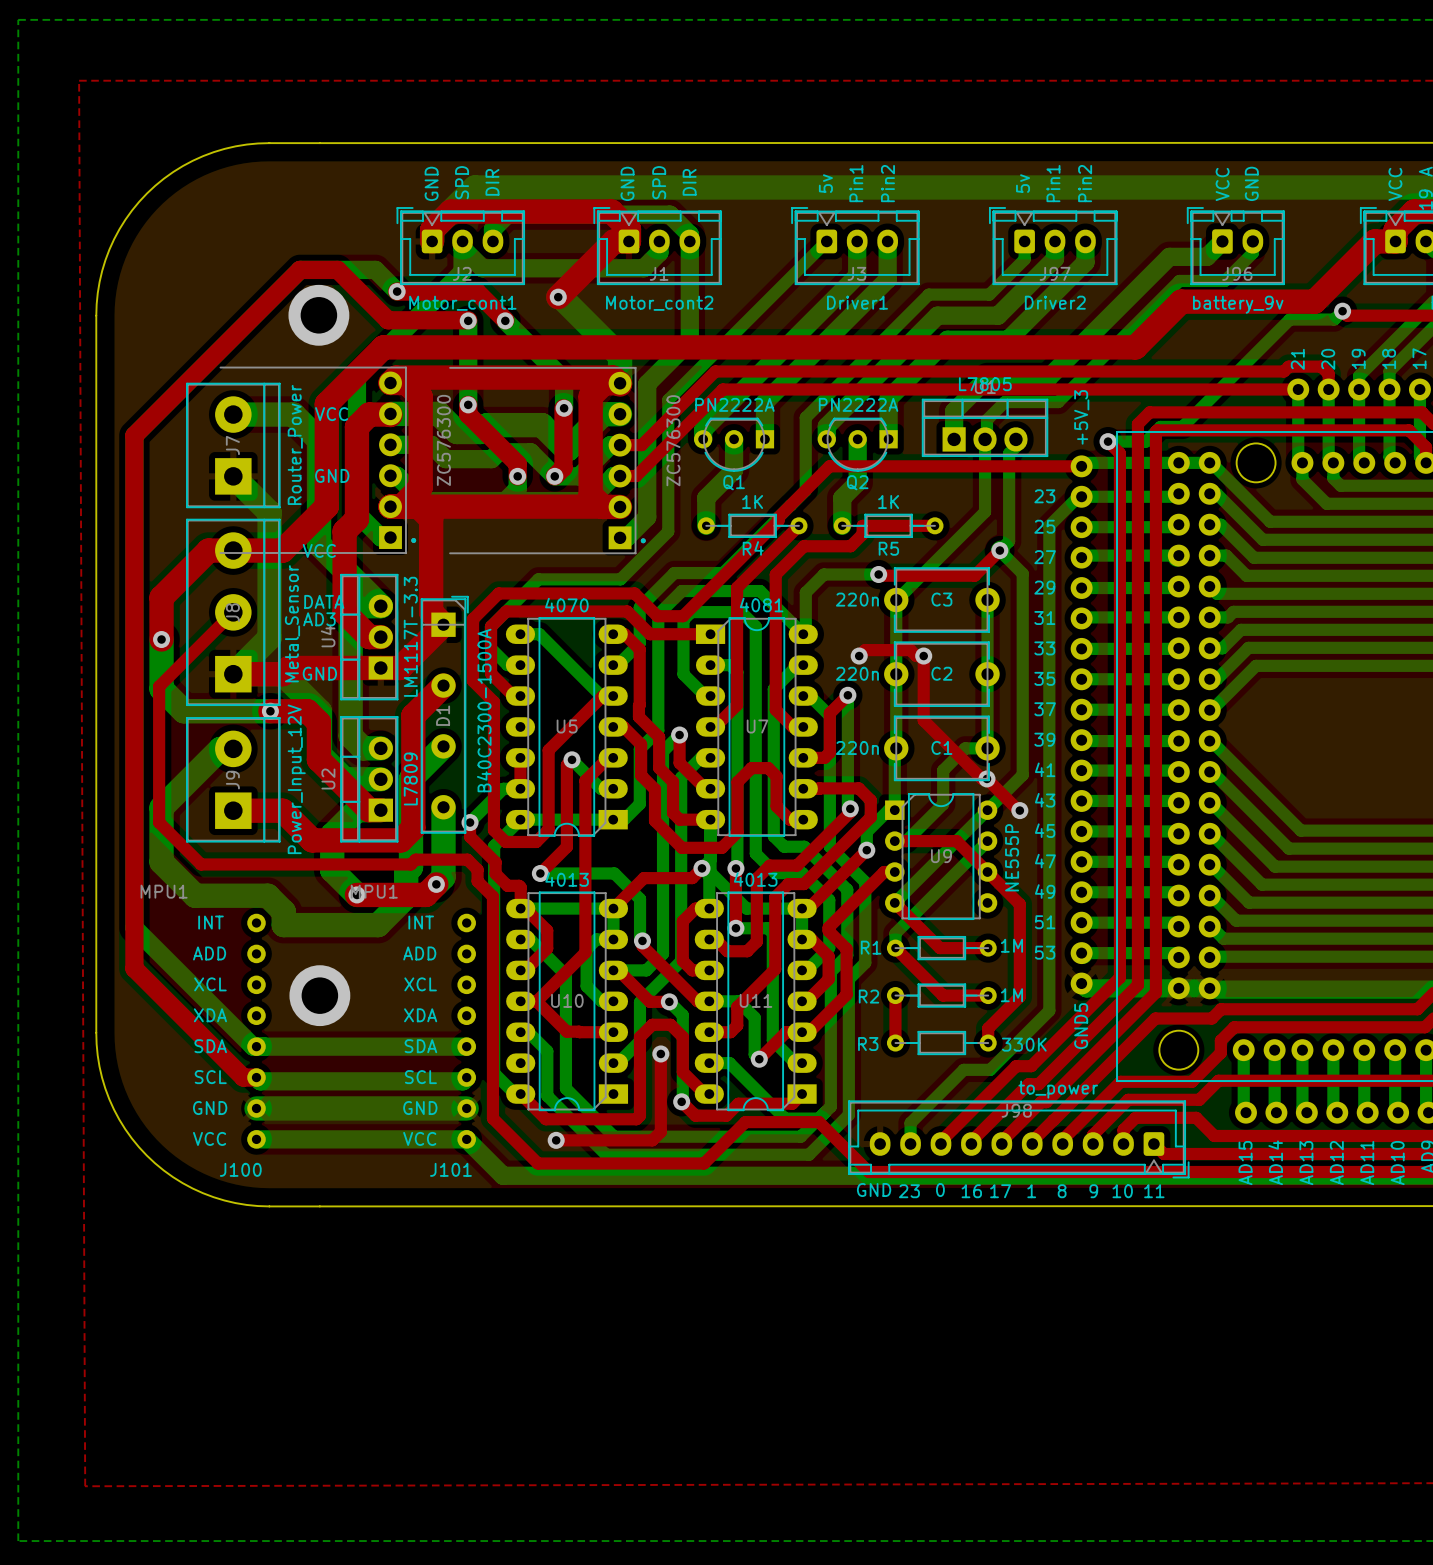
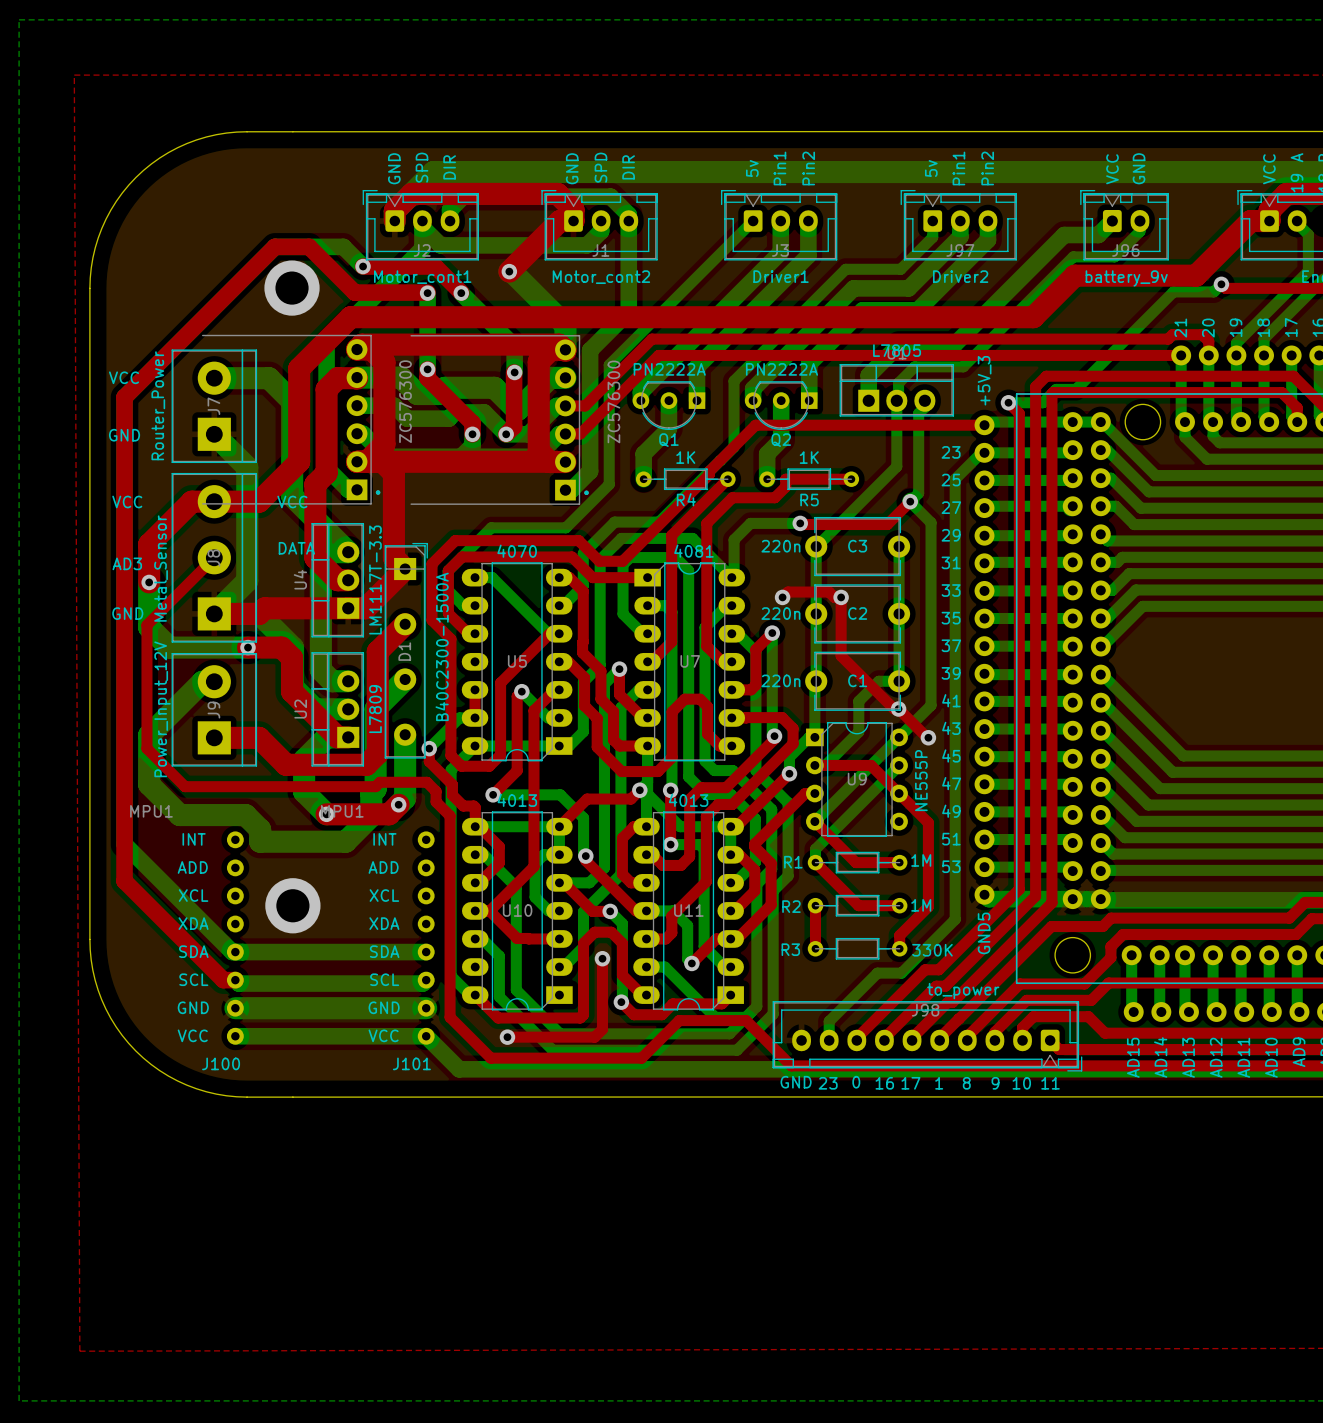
text: none -> VCC (124, 377)
text: VCC (331, 414) -> none
J7 value position: Router_Power (295, 444) -> Router_Power (158, 405)
text: GND (332, 475) -> none
text: none -> GND (124, 435)
text: none -> VCC (127, 502)
text position: AD3 (319, 619) -> AD3 (127, 563)
J8 value position: Metal_Sensor (292, 623) -> Metal_Sensor (161, 568)
text: none -> GND (127, 613)
text: GND (319, 673) -> none
J9 value position: Power_Input_12V (296, 779) -> Power_Input_12V (162, 709)

